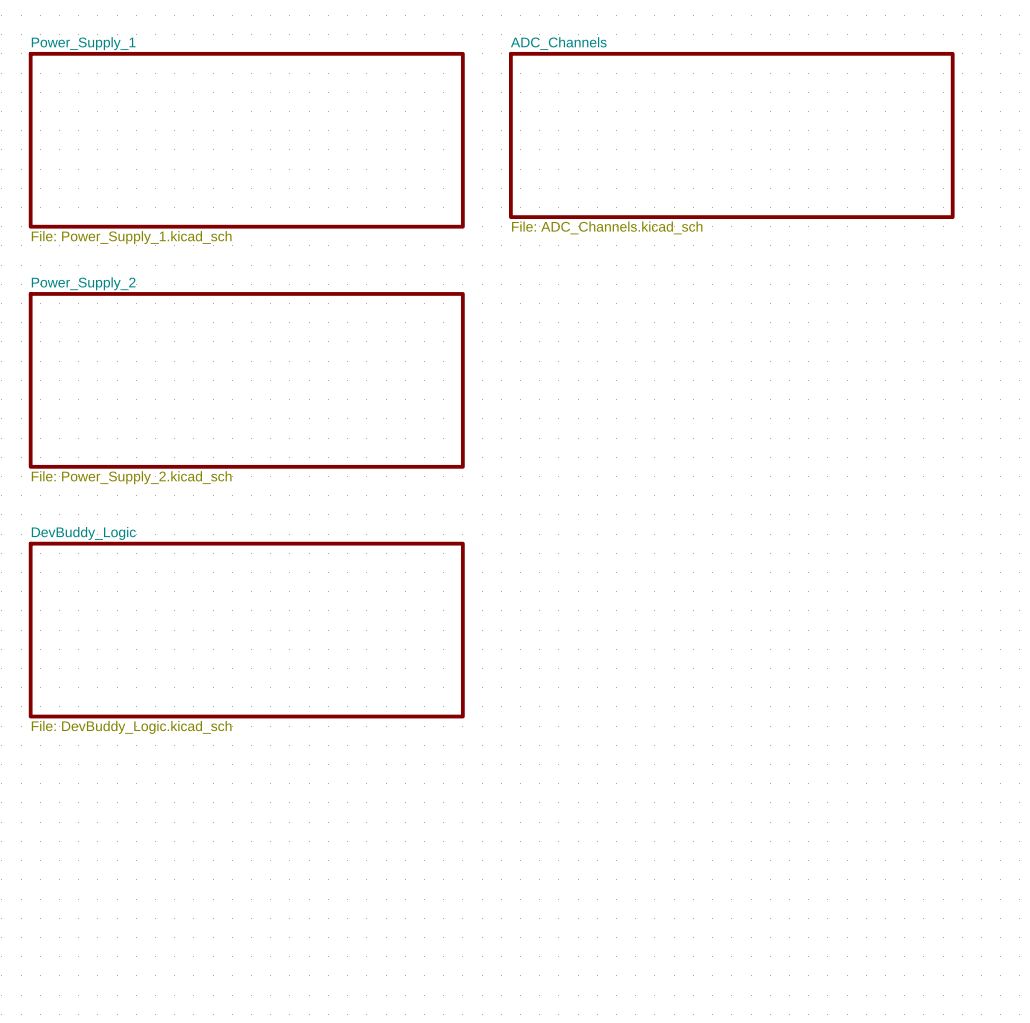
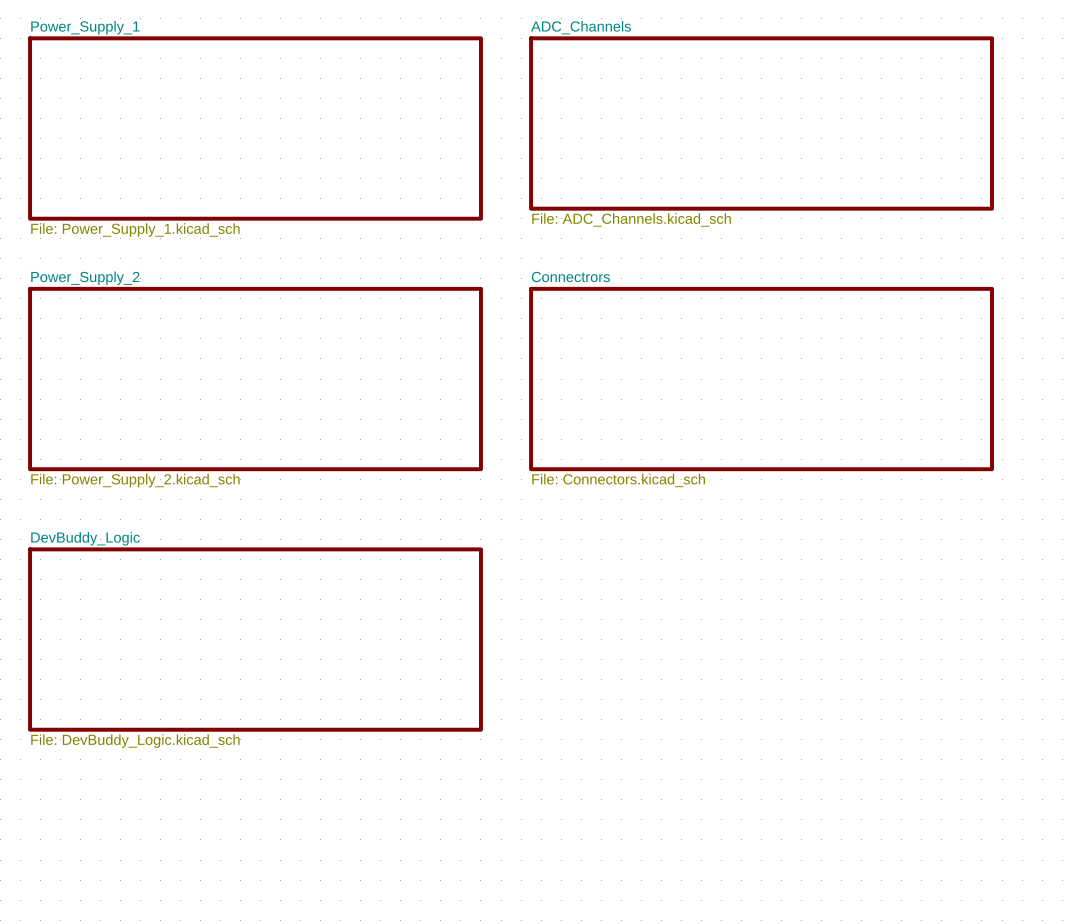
sheet Connectrors: none -> File: Connectors.kicad_sch (761, 379)

